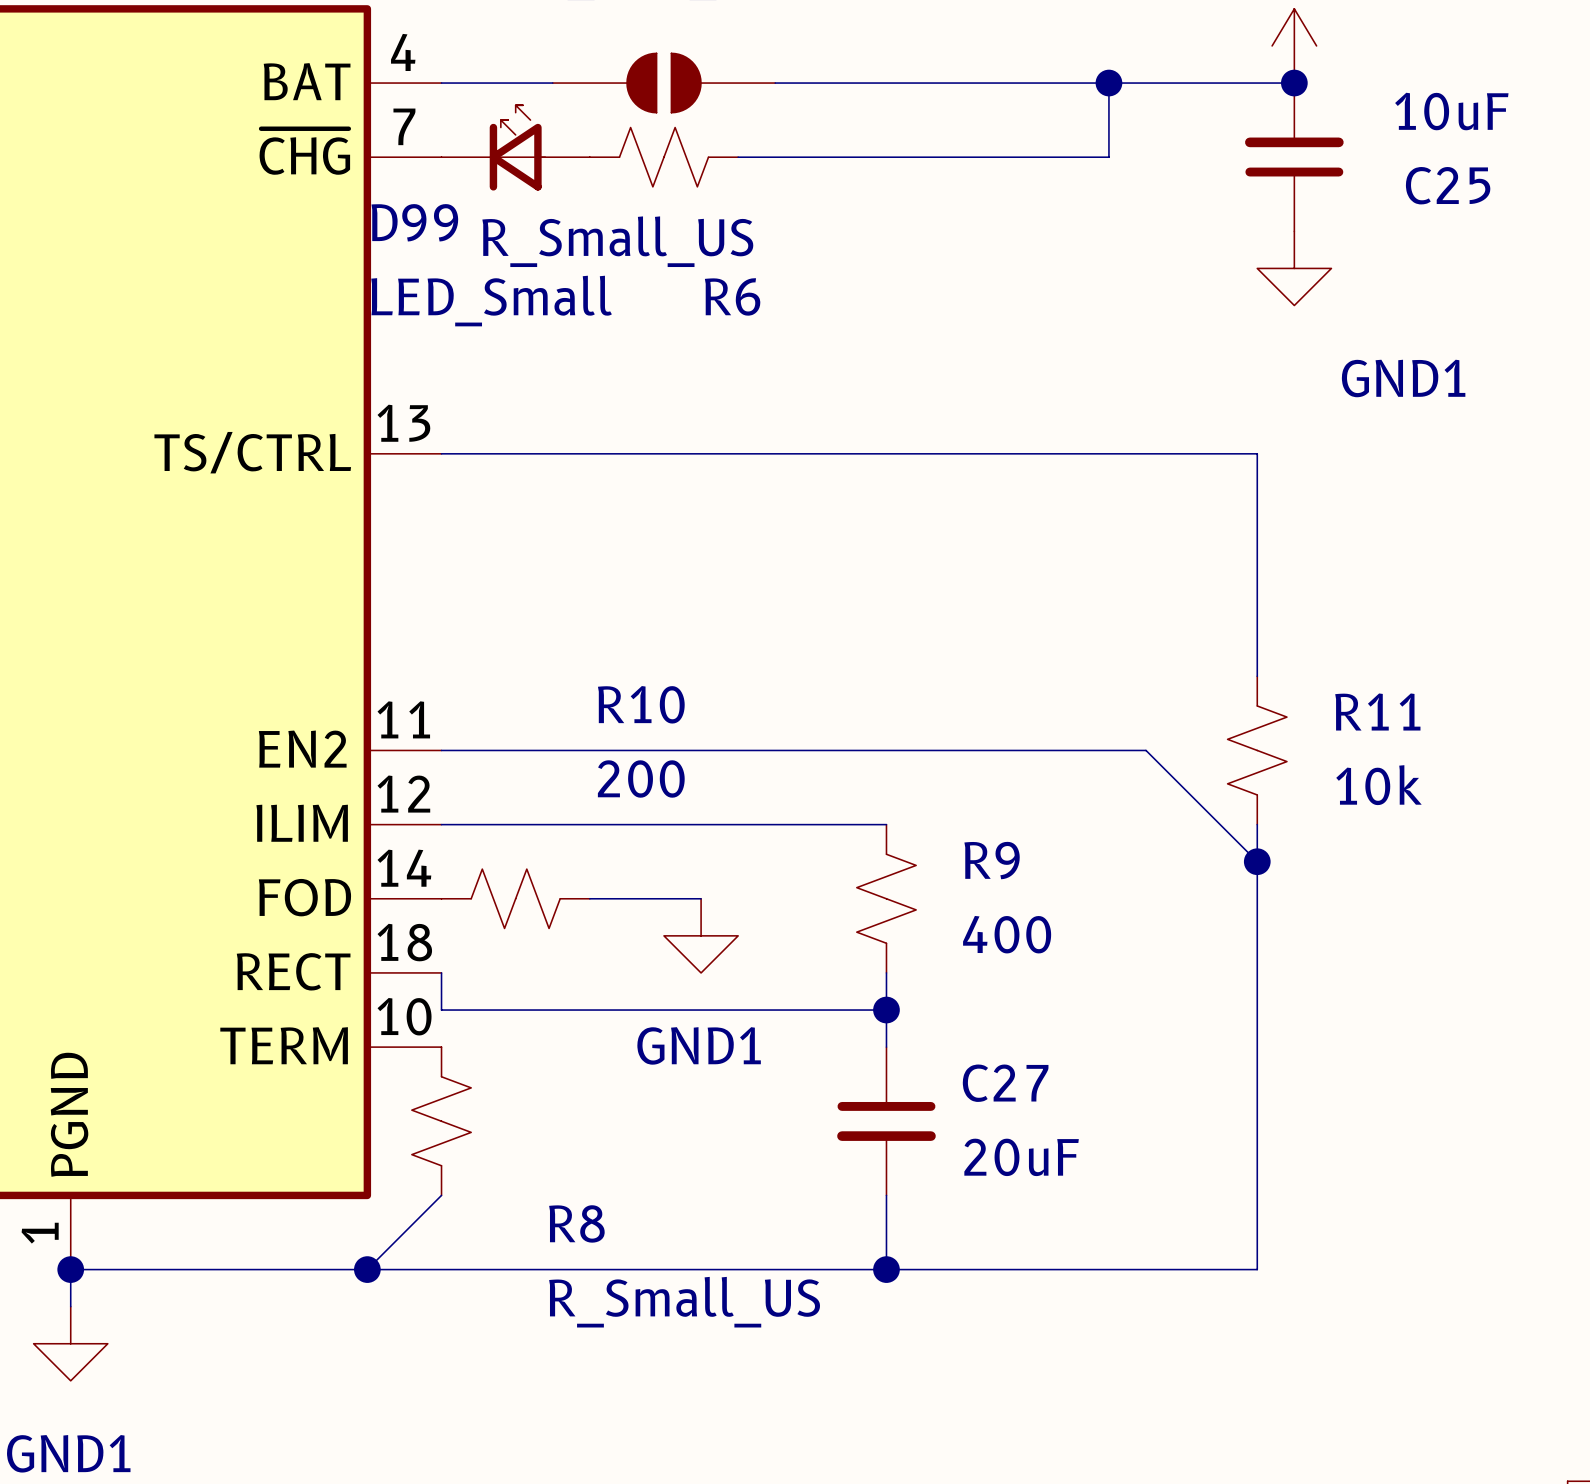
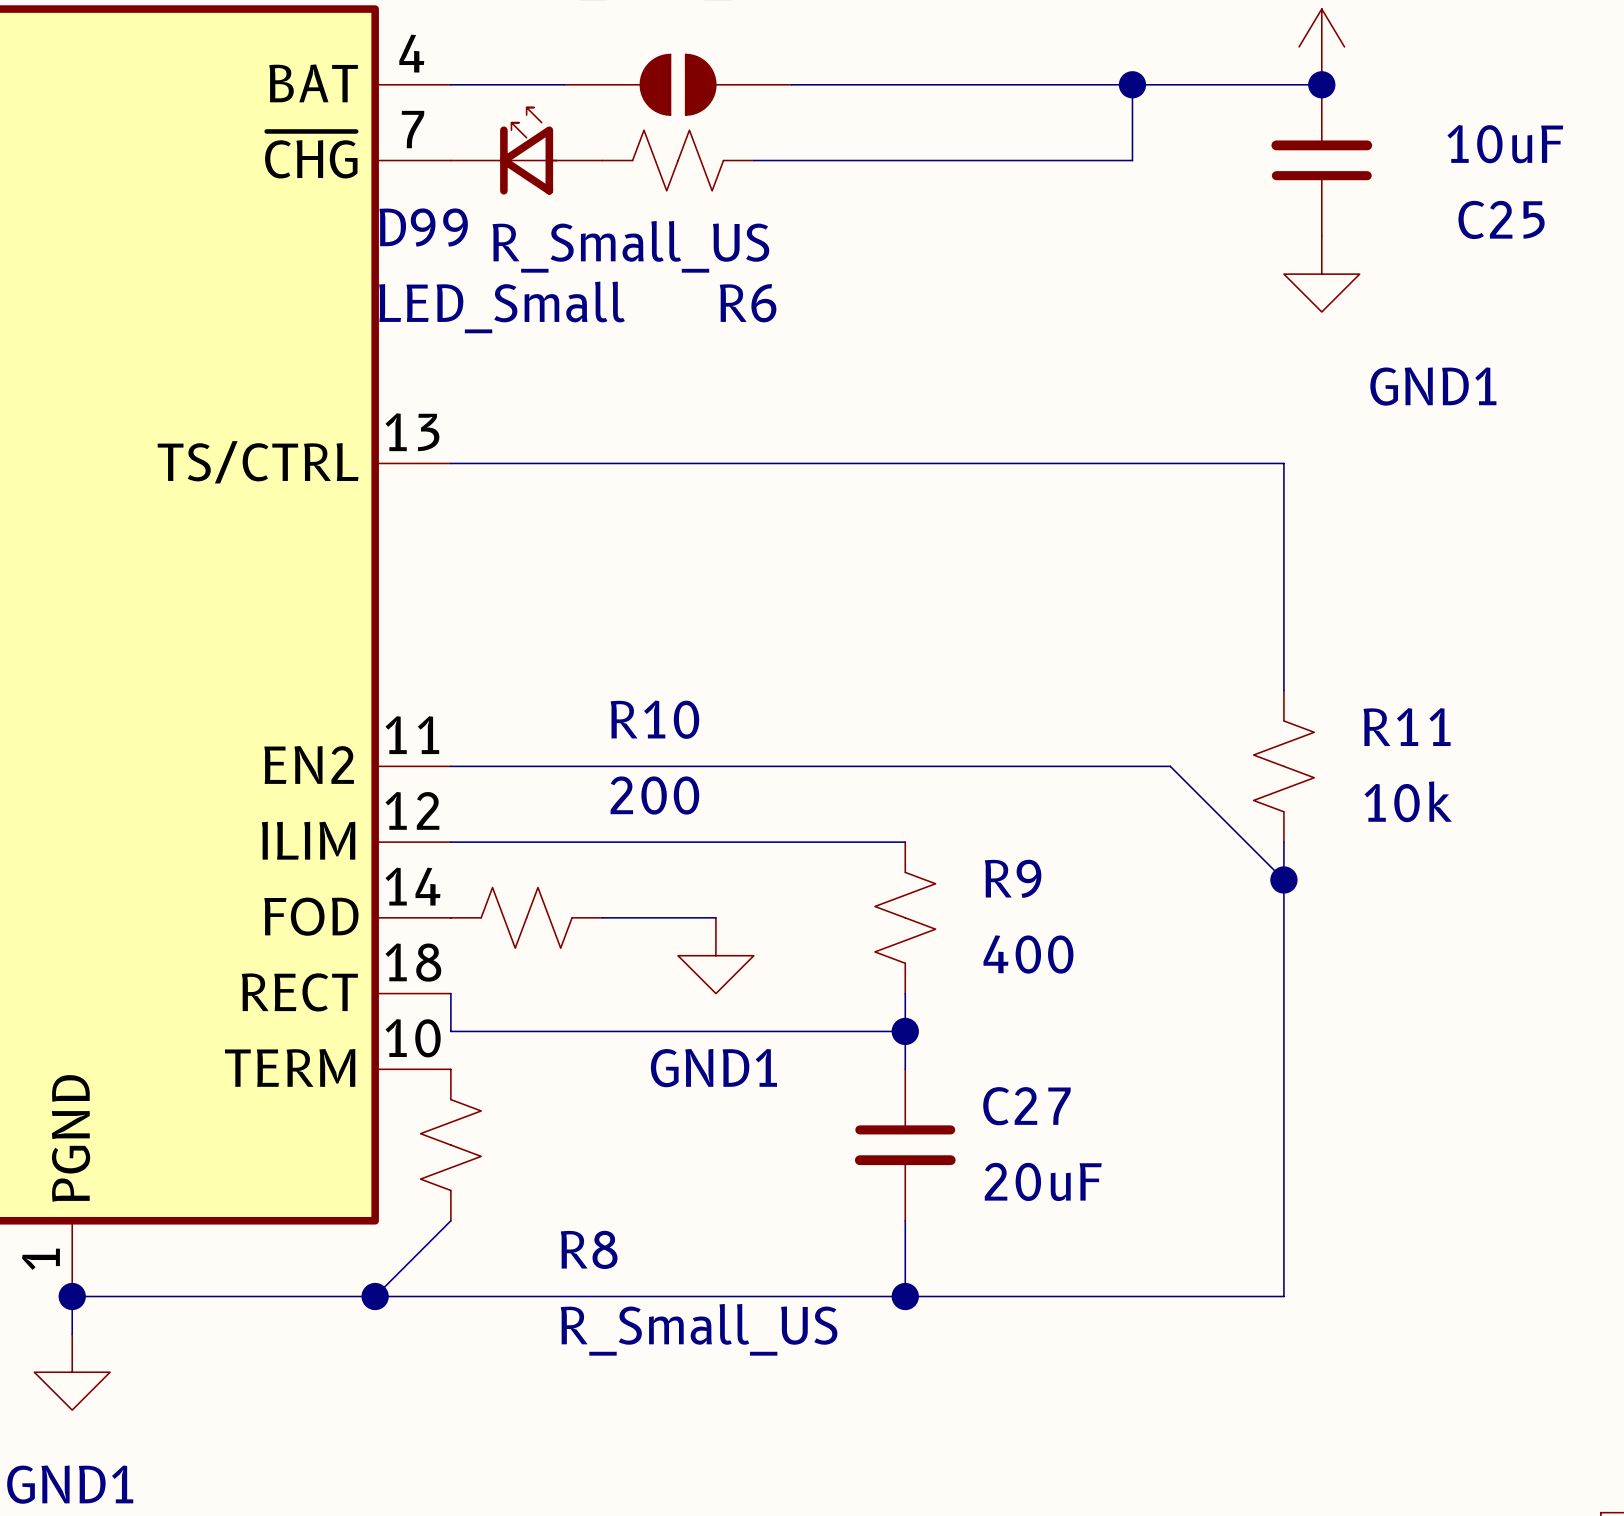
C25 value position: 10uF (1451, 111) -> 10uF (1505, 144)
C25 name position: C25 (1448, 185) -> C25 (1501, 219)

